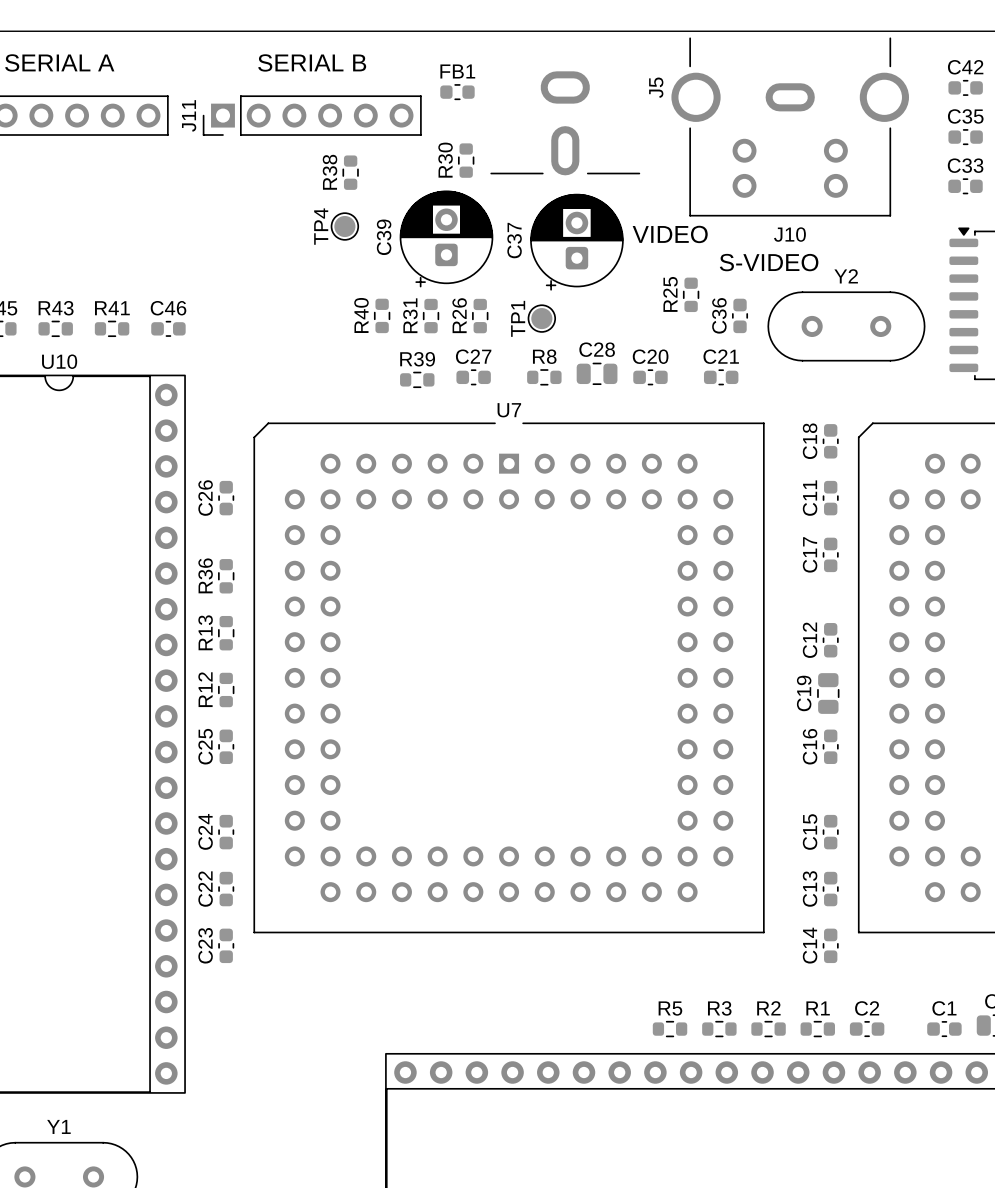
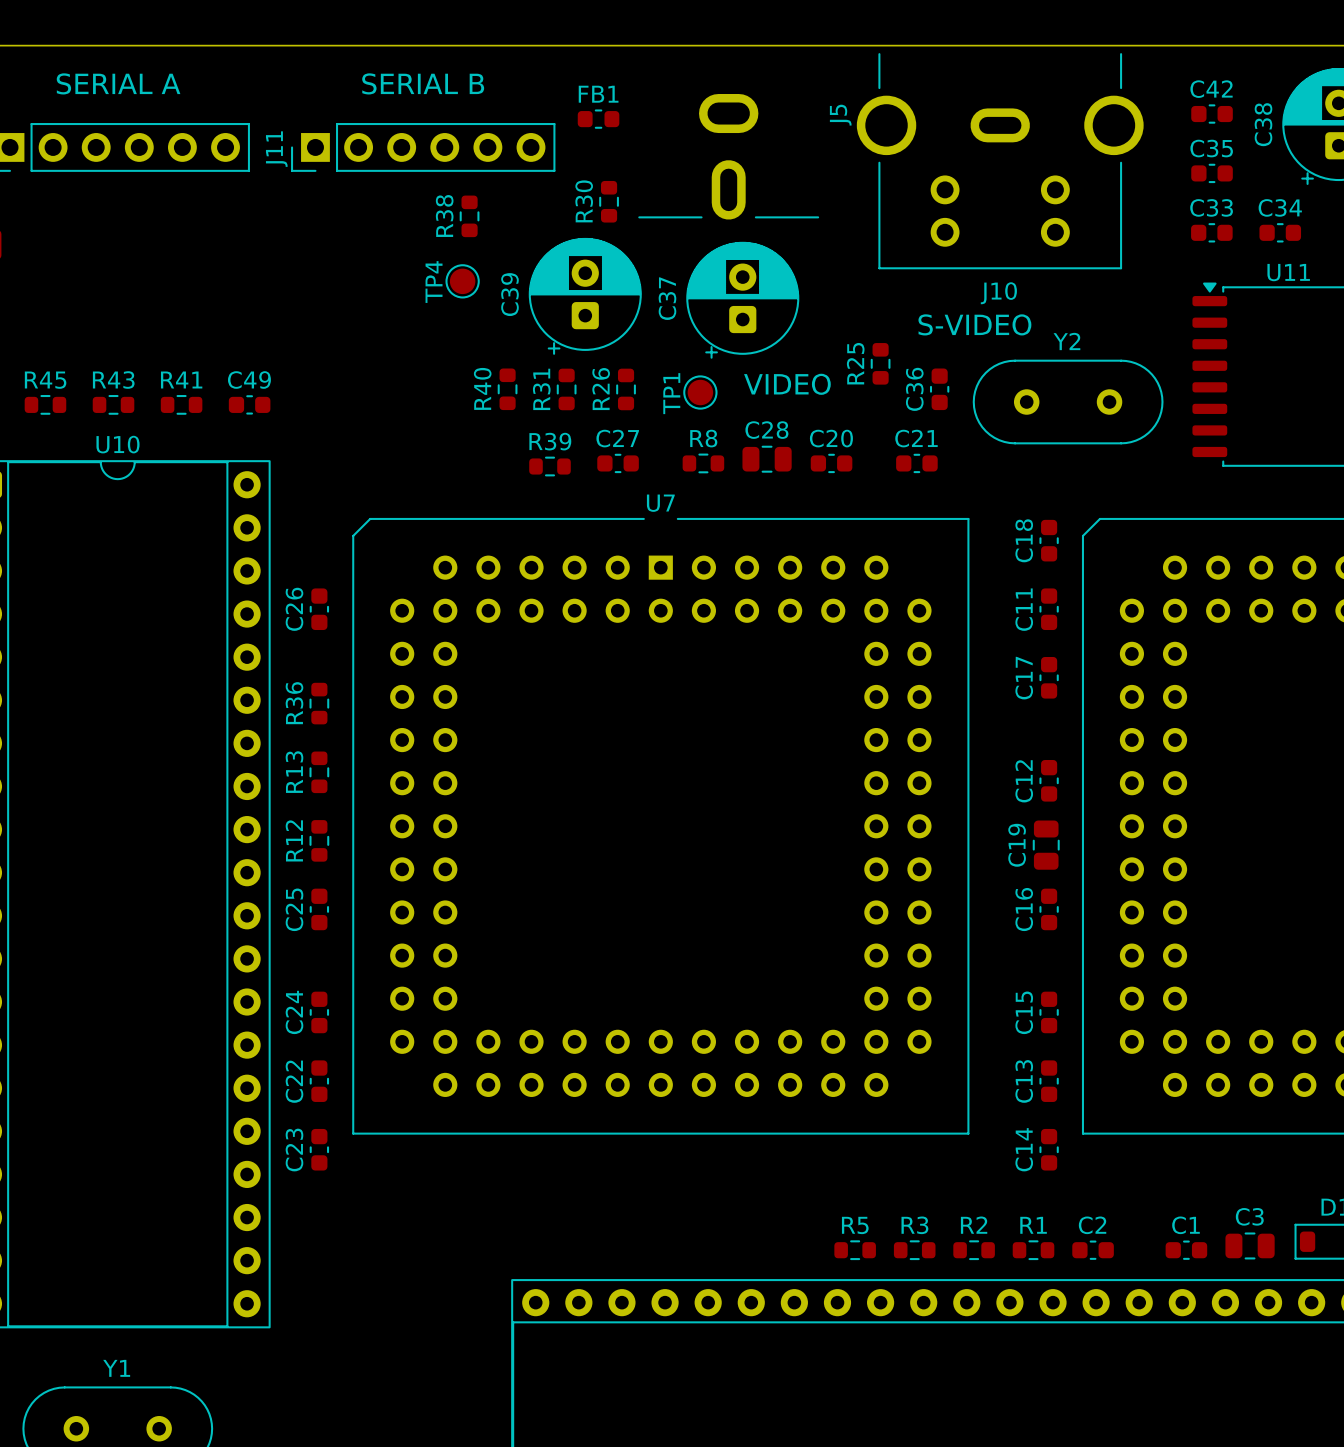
text position: VIDEO (670, 234) -> VIDEO (787, 384)
C46 name: C46 (168, 308) -> C49 (249, 380)

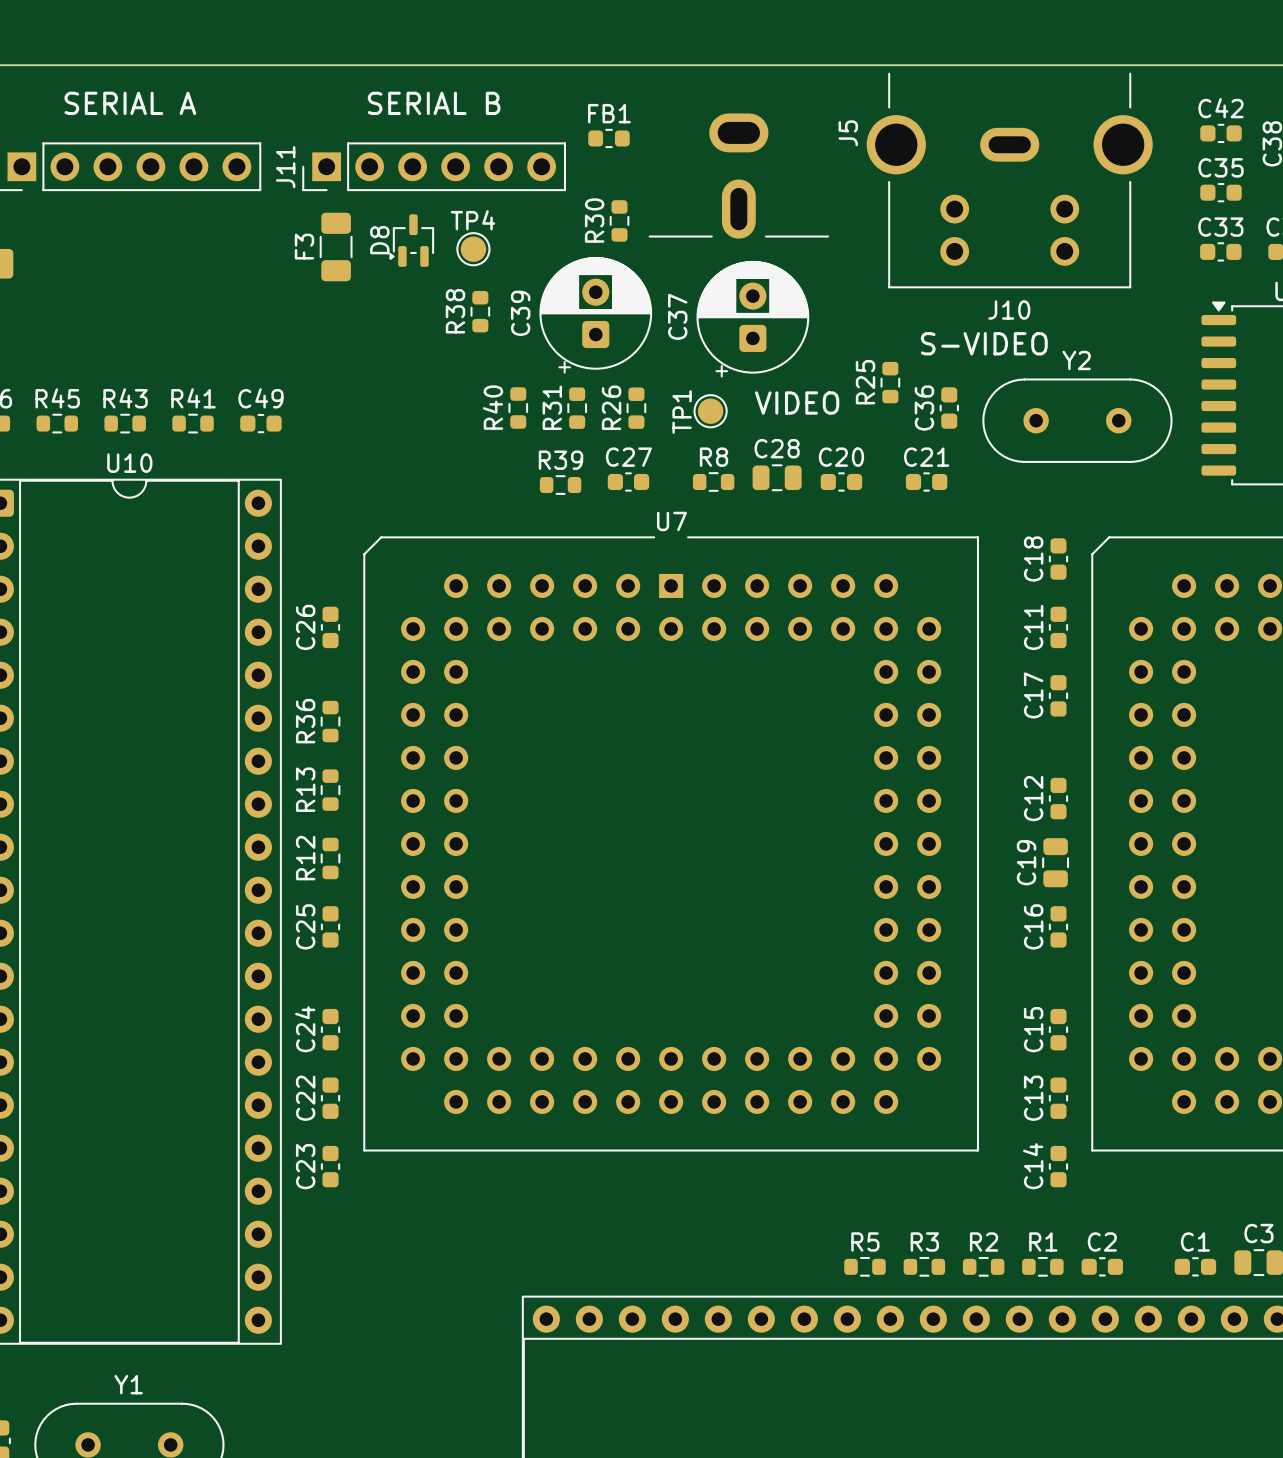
R38 position: (469, 216) -> (480, 311)
D8: none -> (411, 240)
F3: none -> (336, 247)
TP4 position: (462, 281) -> (473, 249)
TP4 name rotation: 0° (434, 282) -> 90° clockwise (473, 220)

